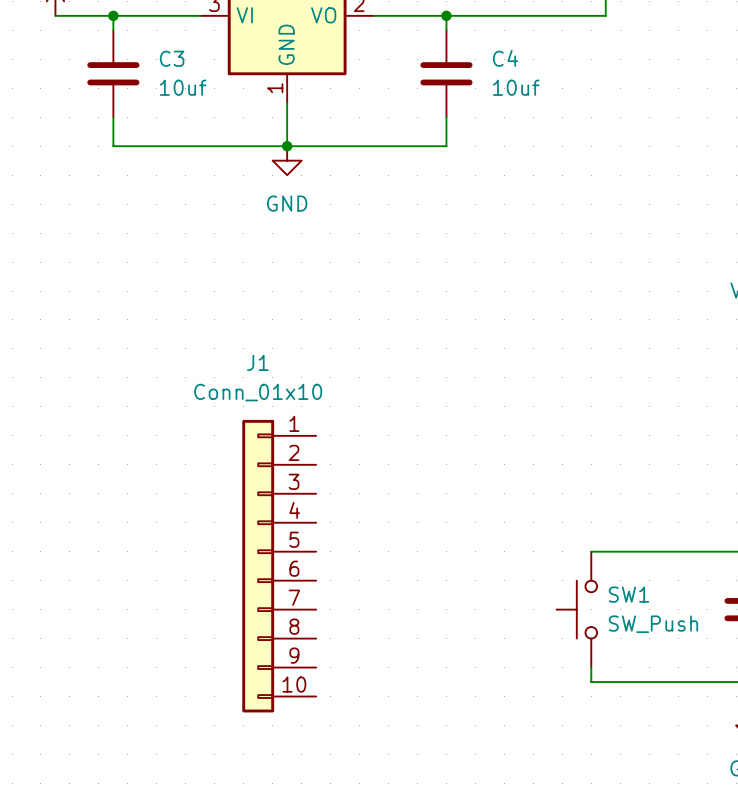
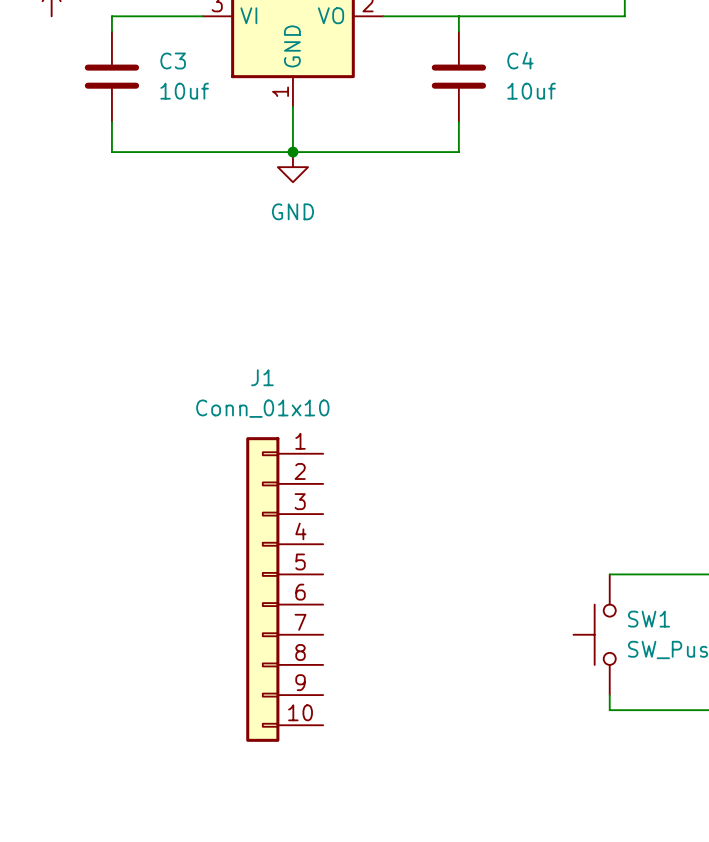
wire: (55, 15) (113, 15) -> none
junction: (113, 15) -> none
junction: (446, 15) -> none

